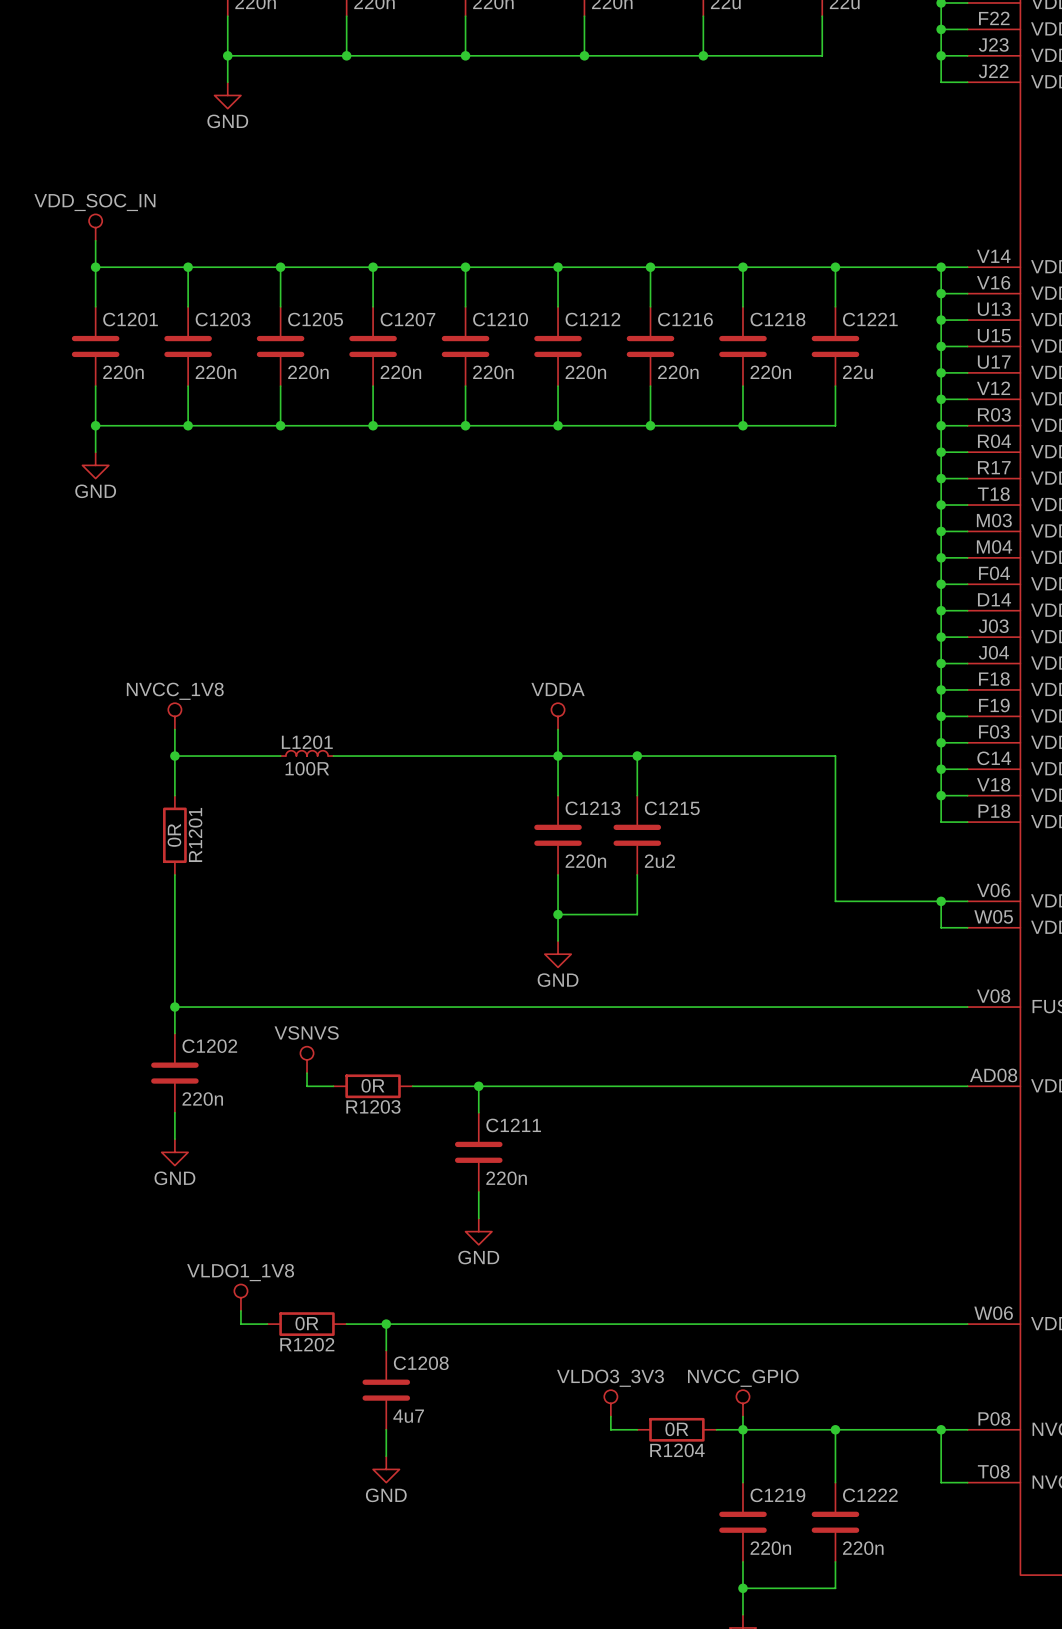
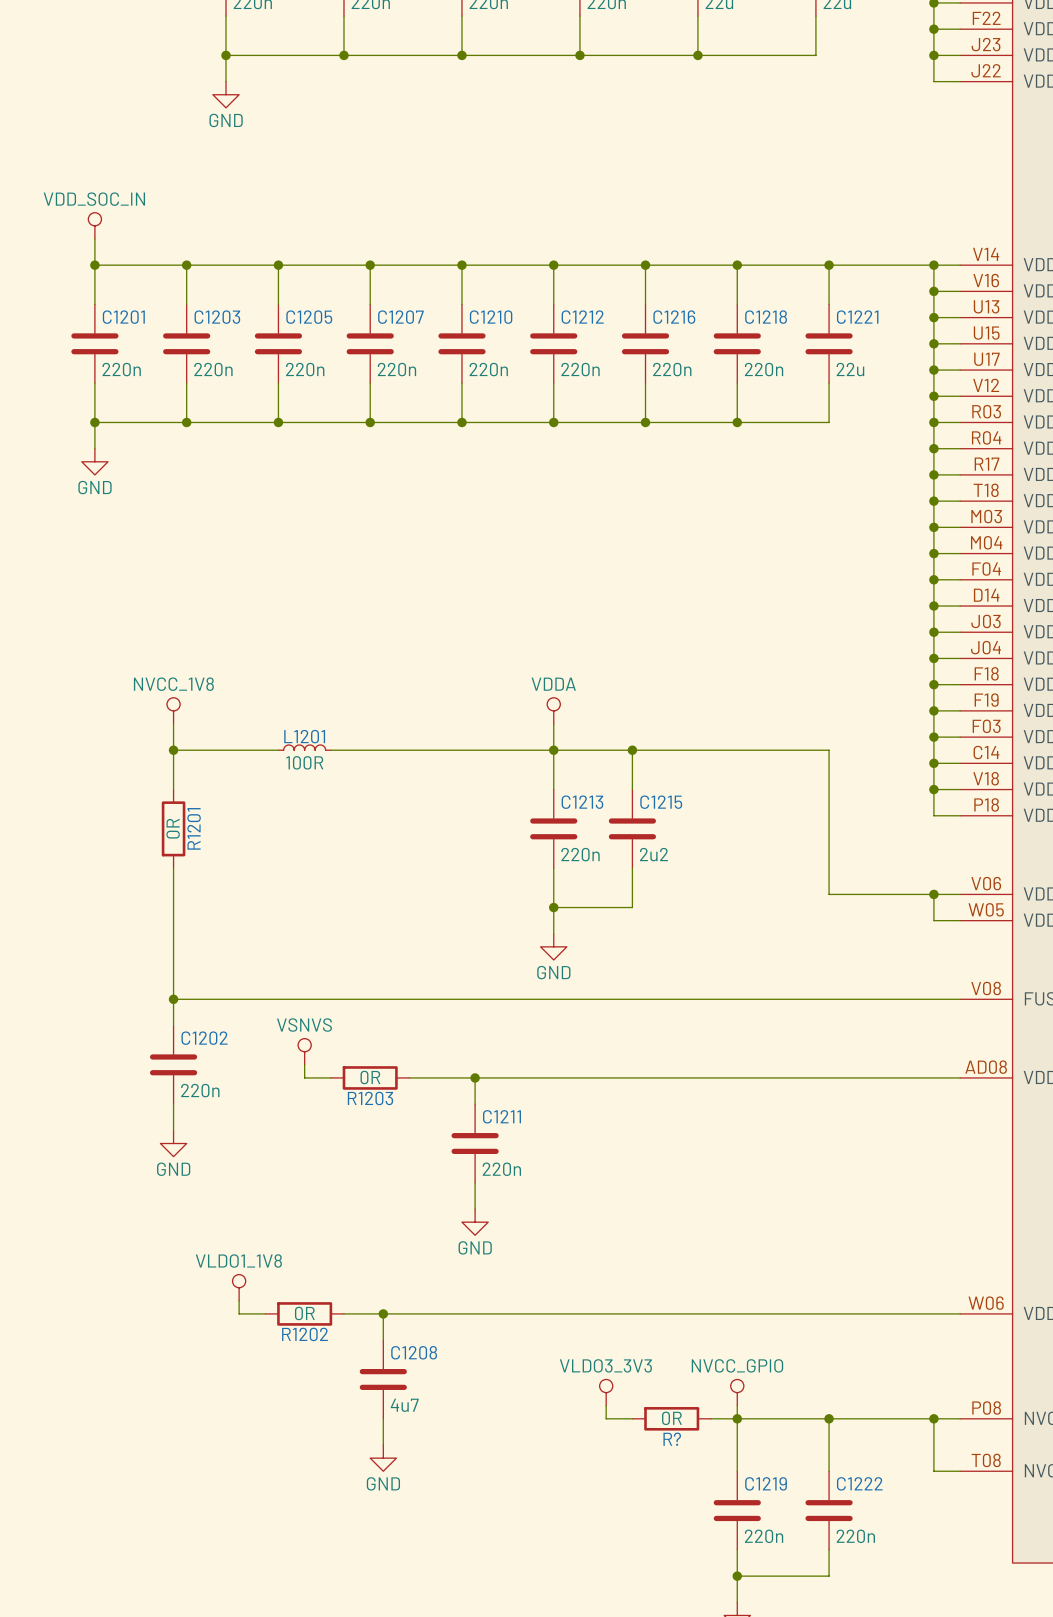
R1204 name: R1204 (677, 1450) -> R? (672, 1439)

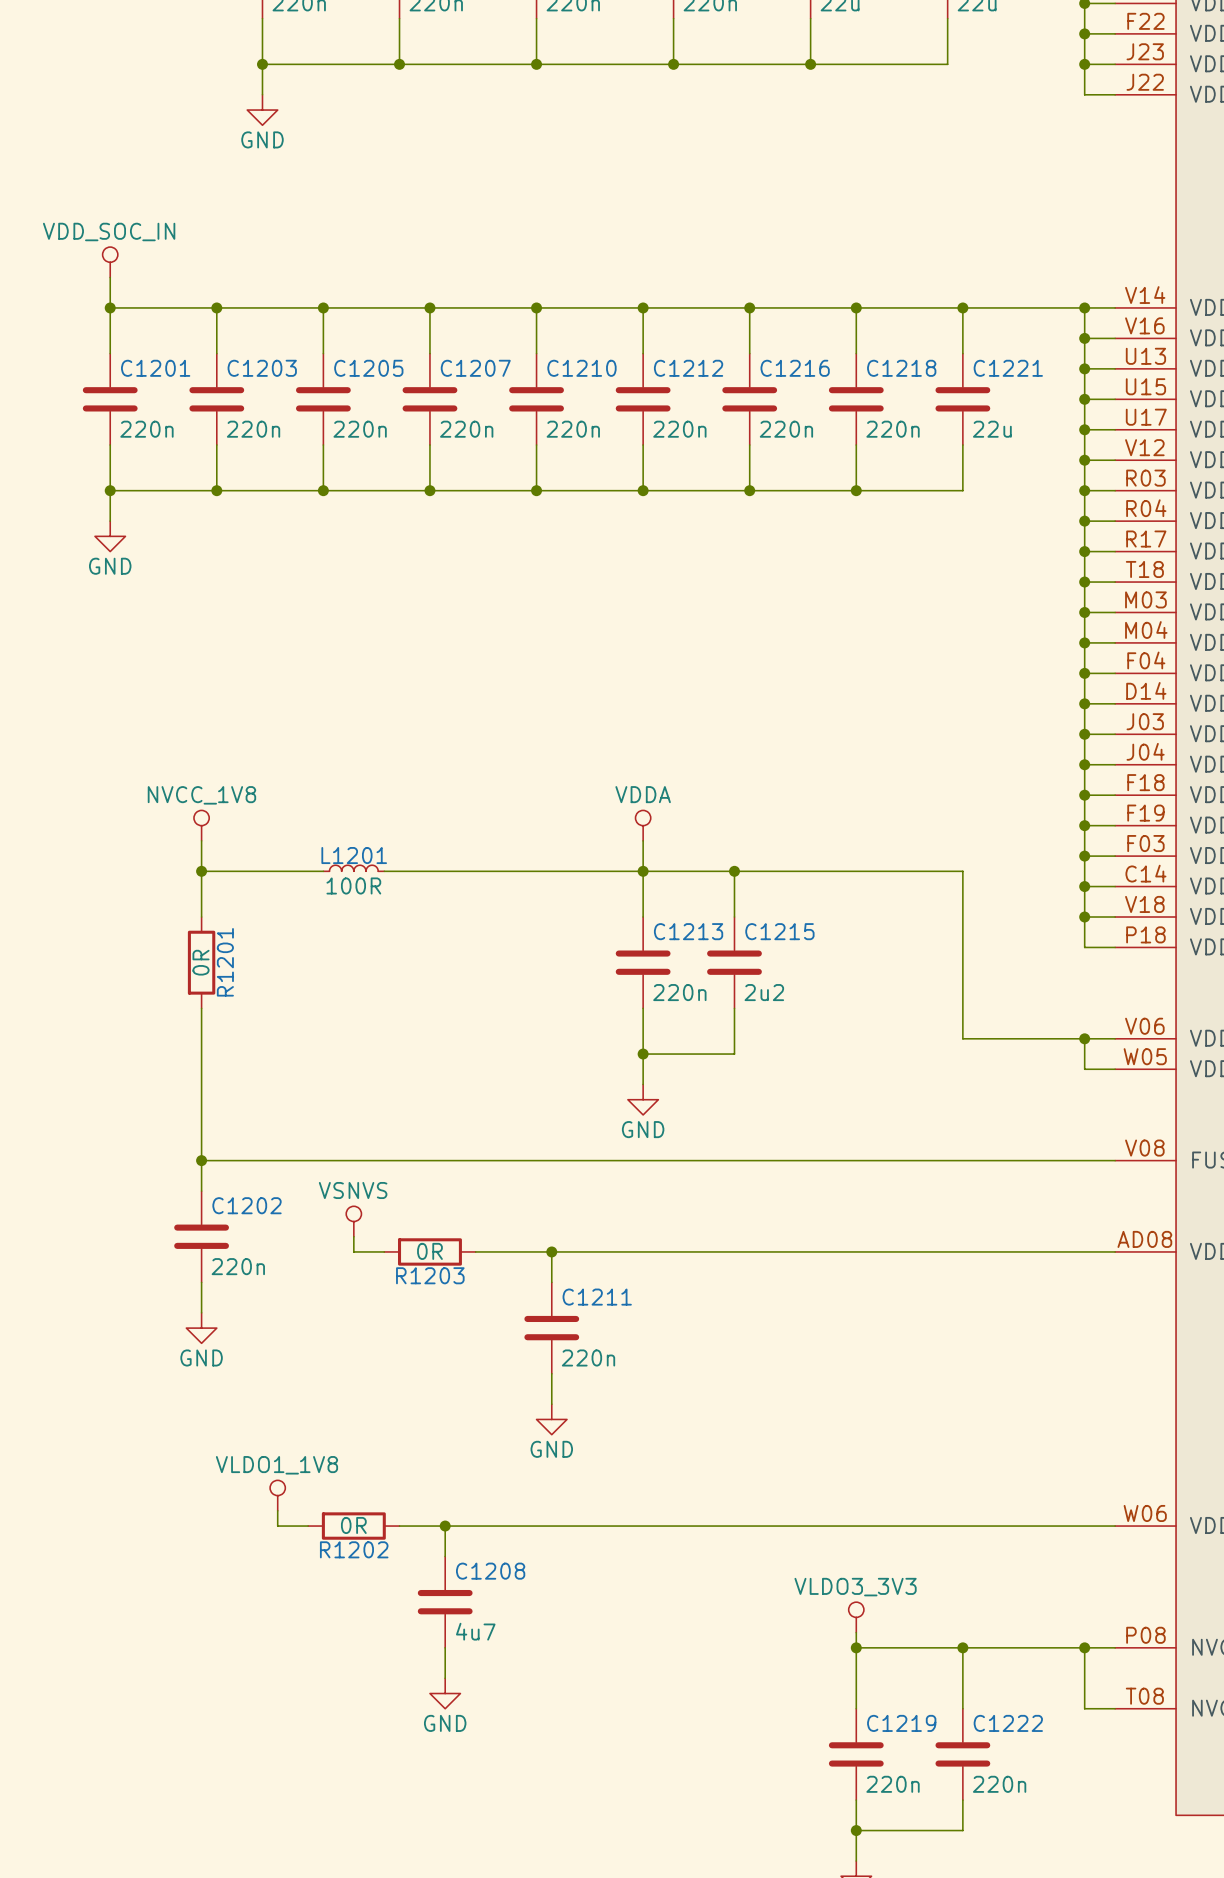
power symbol: VLDO3_3V3 (606, 1392) -> none
power symbol: NVCC_GPIO (737, 1392) -> VLDO3_3V3 (856, 1617)
wire: (606, 1405) (606, 1418) (632, 1418) -> none
R?: 0R (671, 1418) -> none
wire: (711, 1418) (737, 1418) -> none

